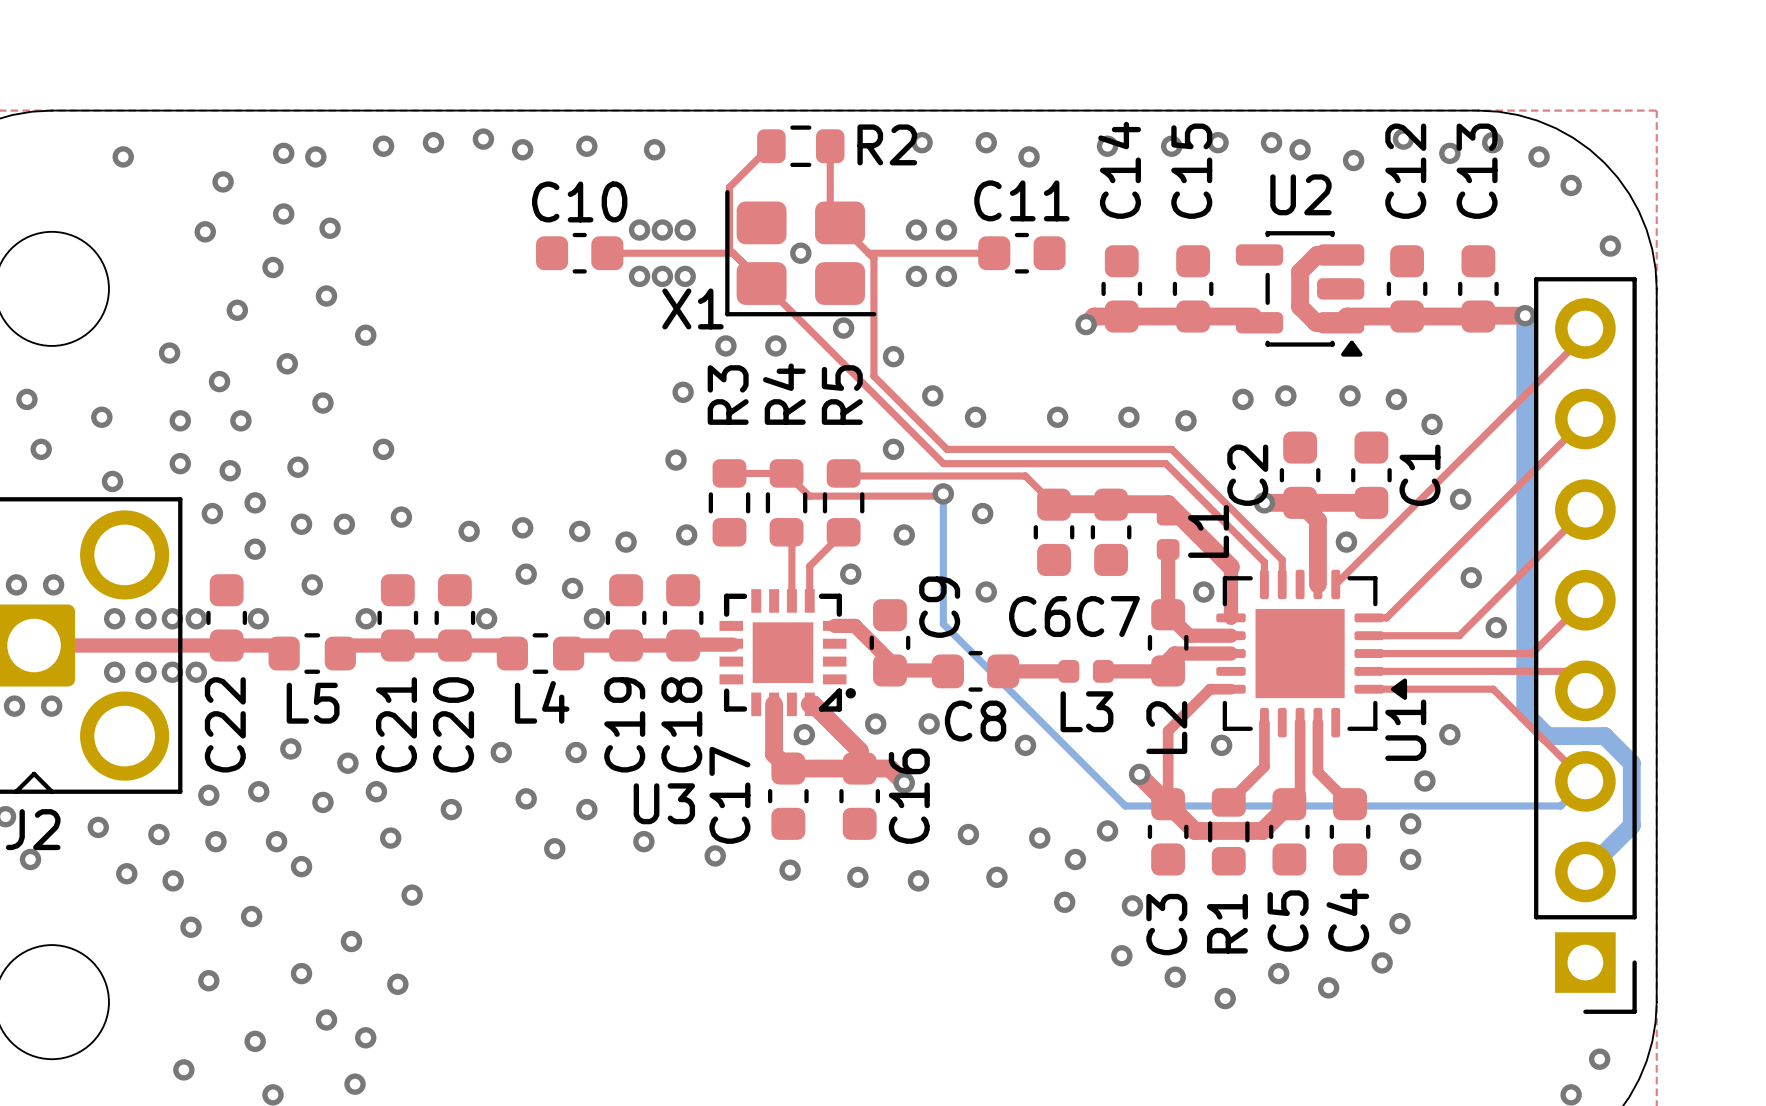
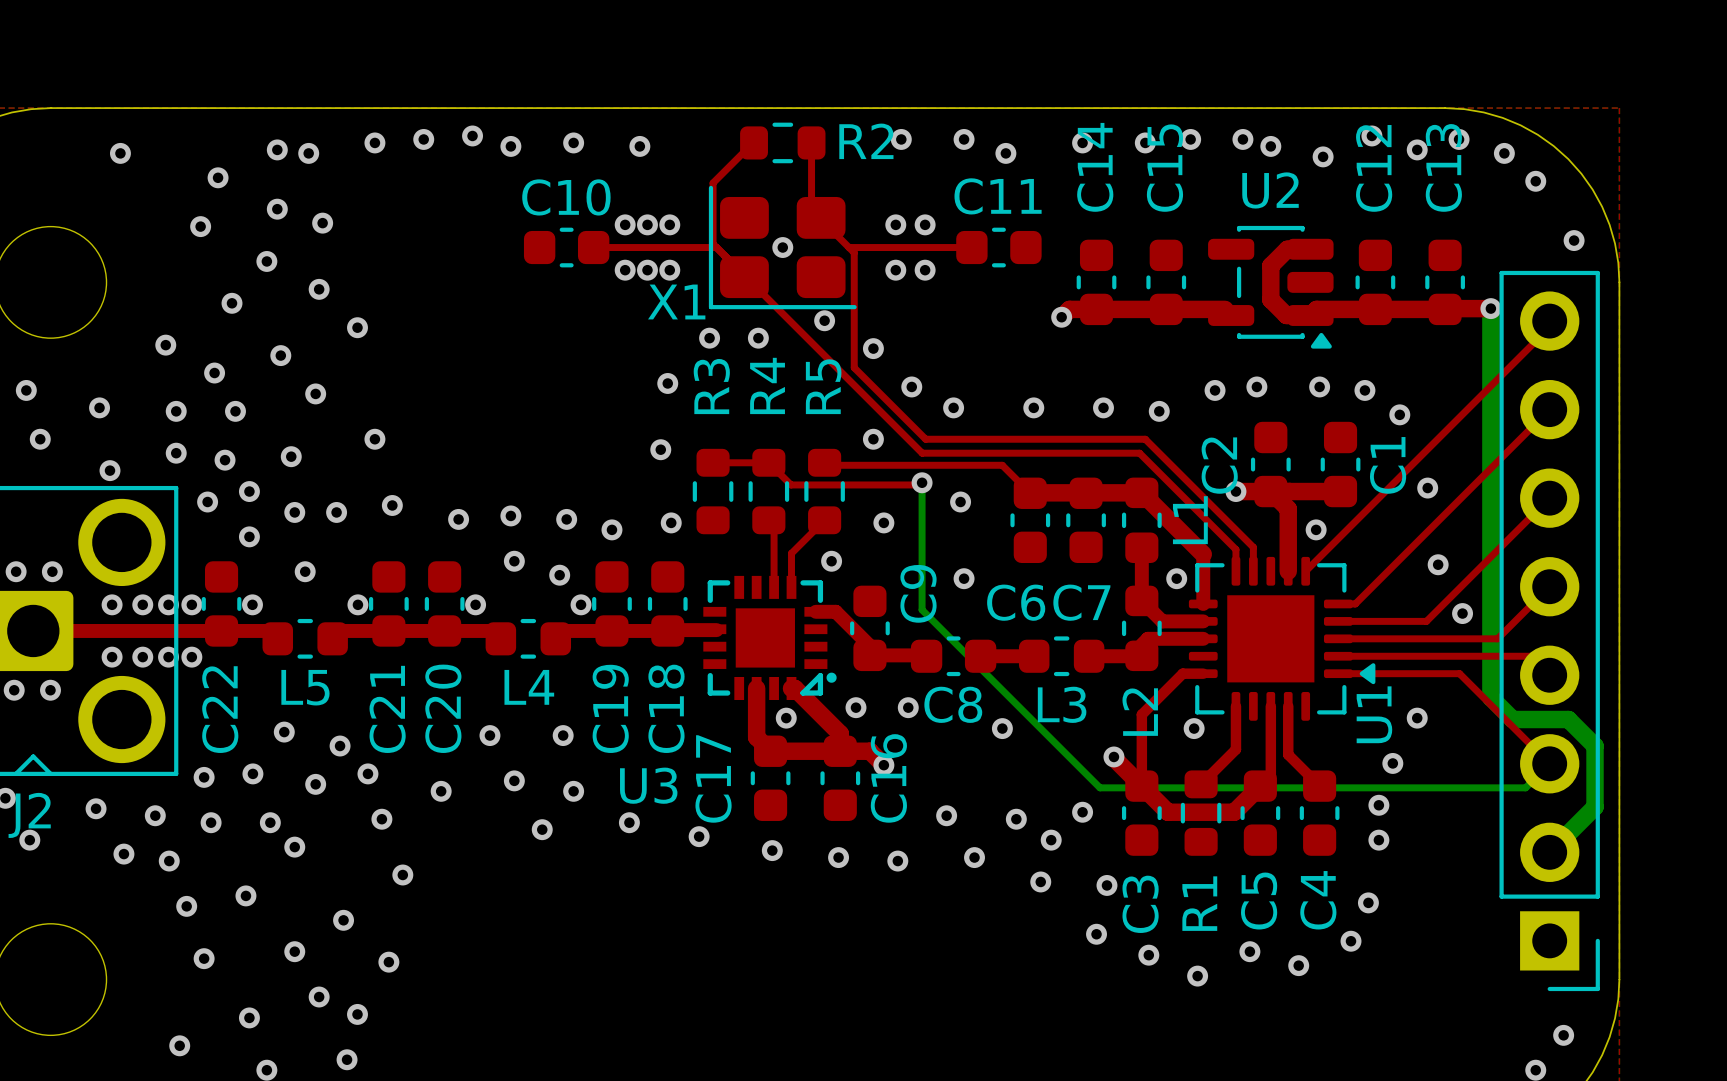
L1 footprint: [1156, 504, 1180, 561] -> [1121, 477, 1162, 564]
L3 footprint: [1058, 659, 1114, 683] -> [1018, 636, 1105, 677]

